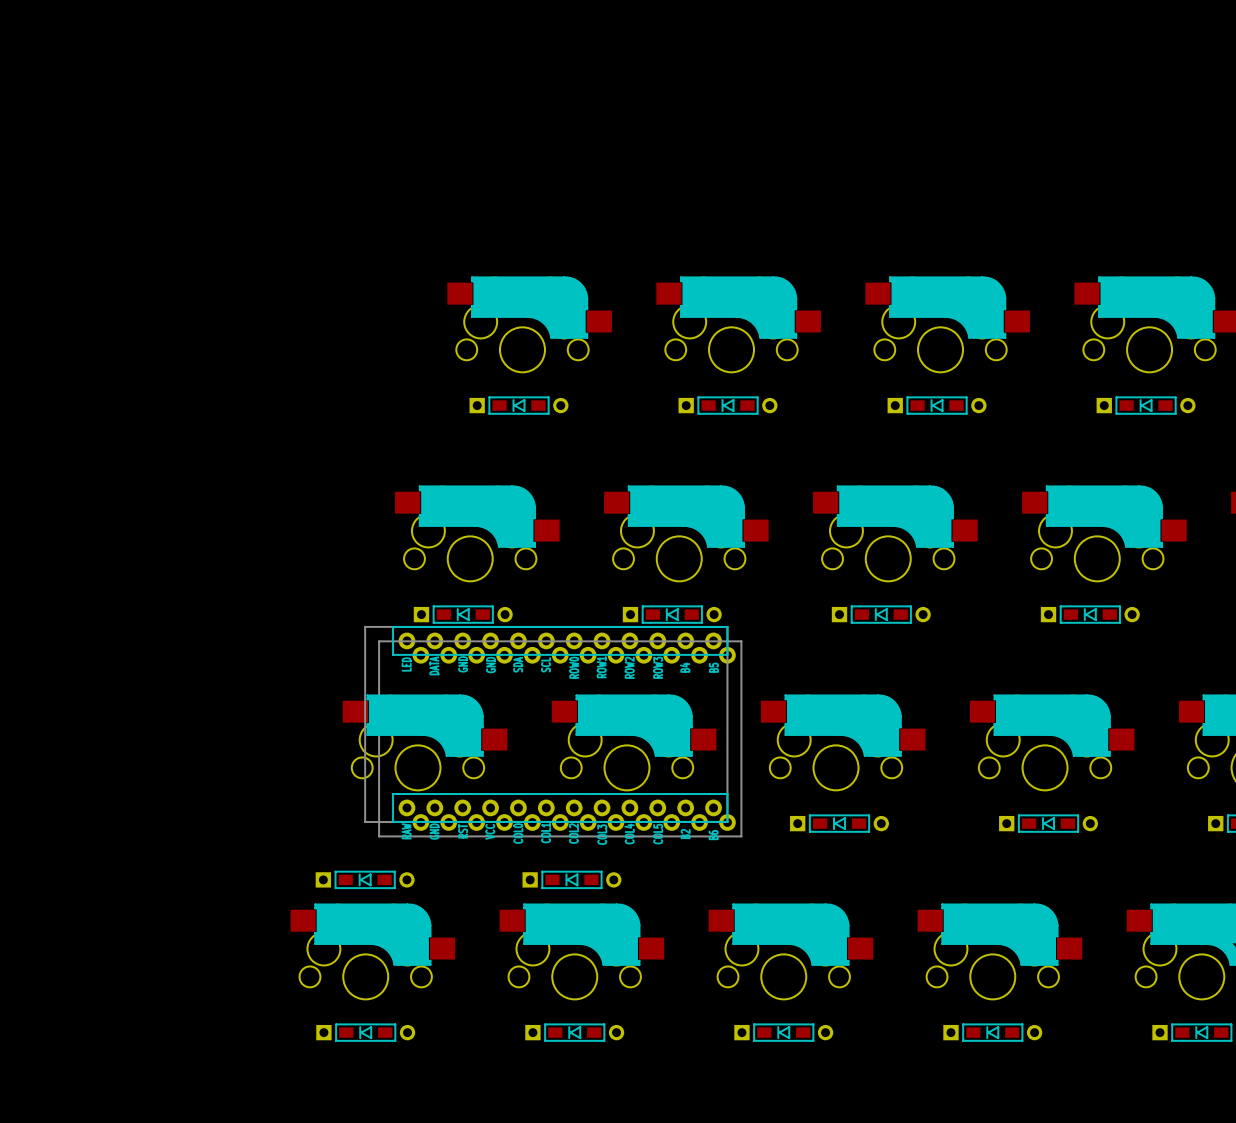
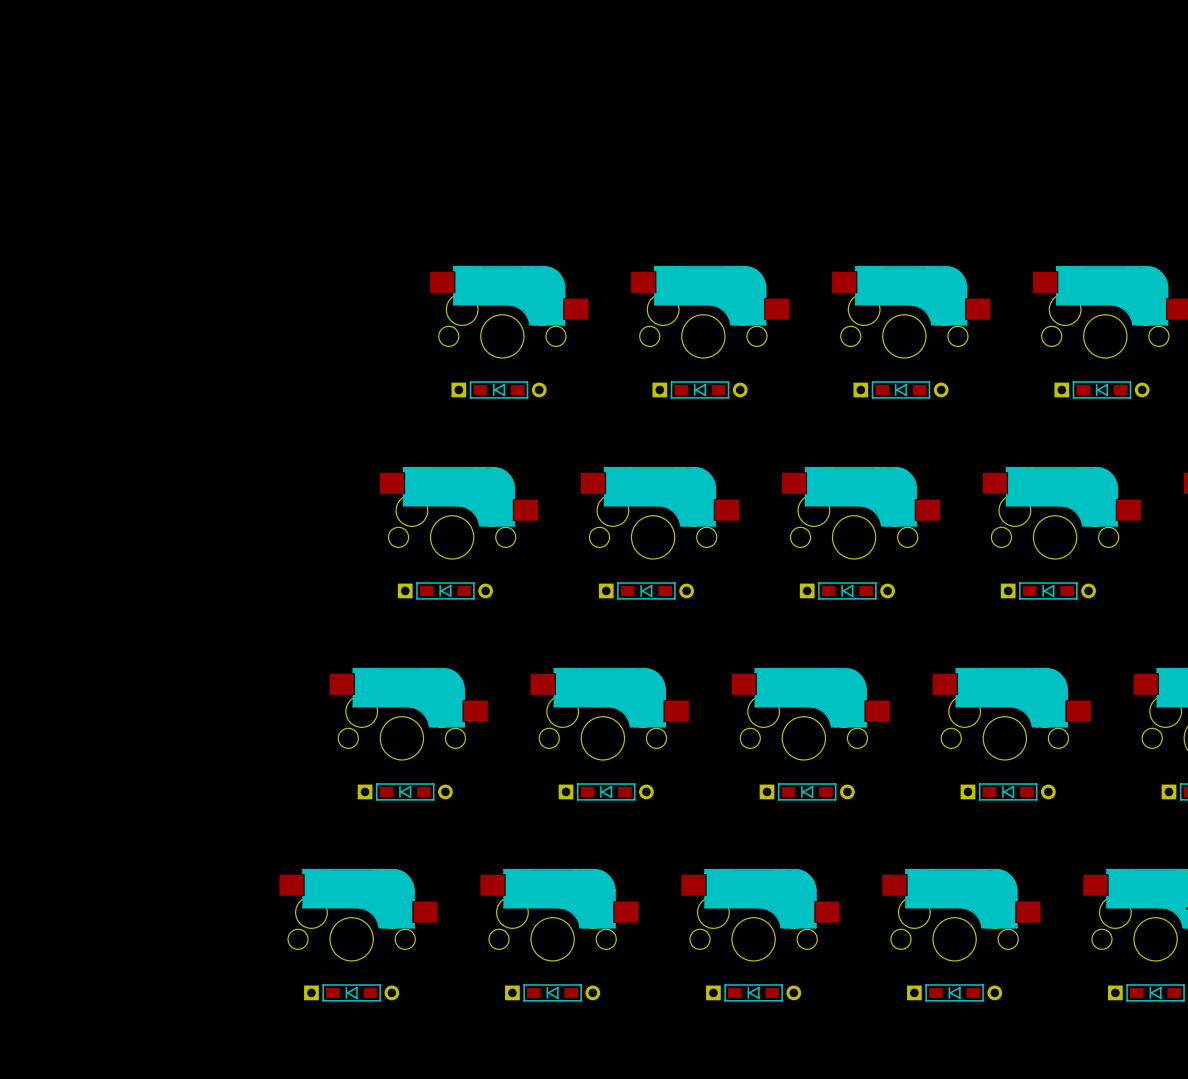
part: (553, 731) -> none
part: none -> (606, 791)
part position: (365, 879) -> (405, 791)
part: (571, 879) -> none

